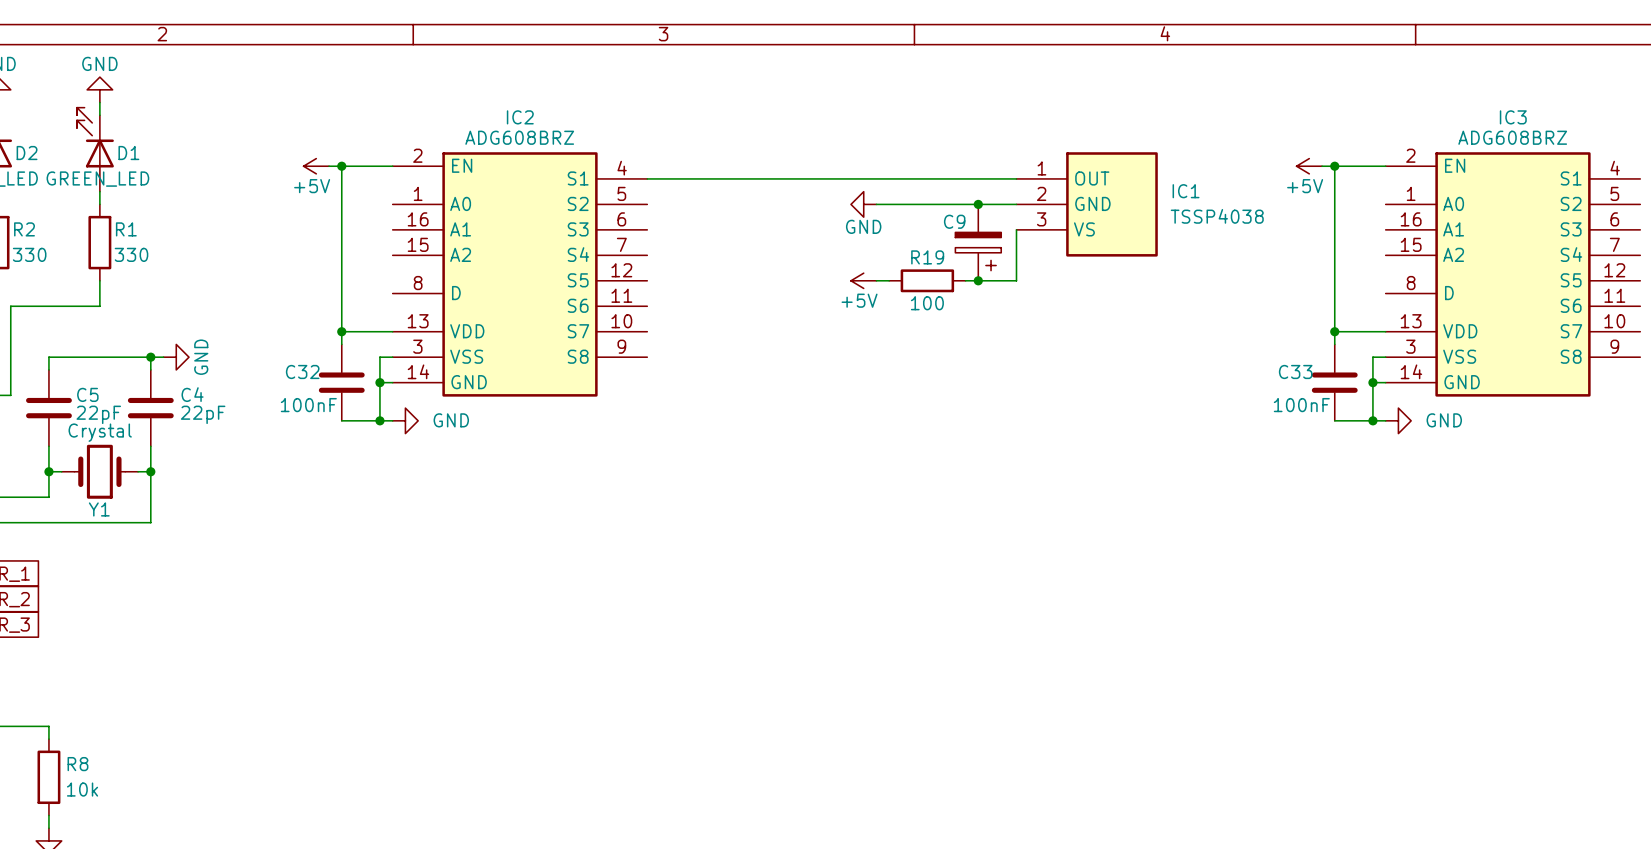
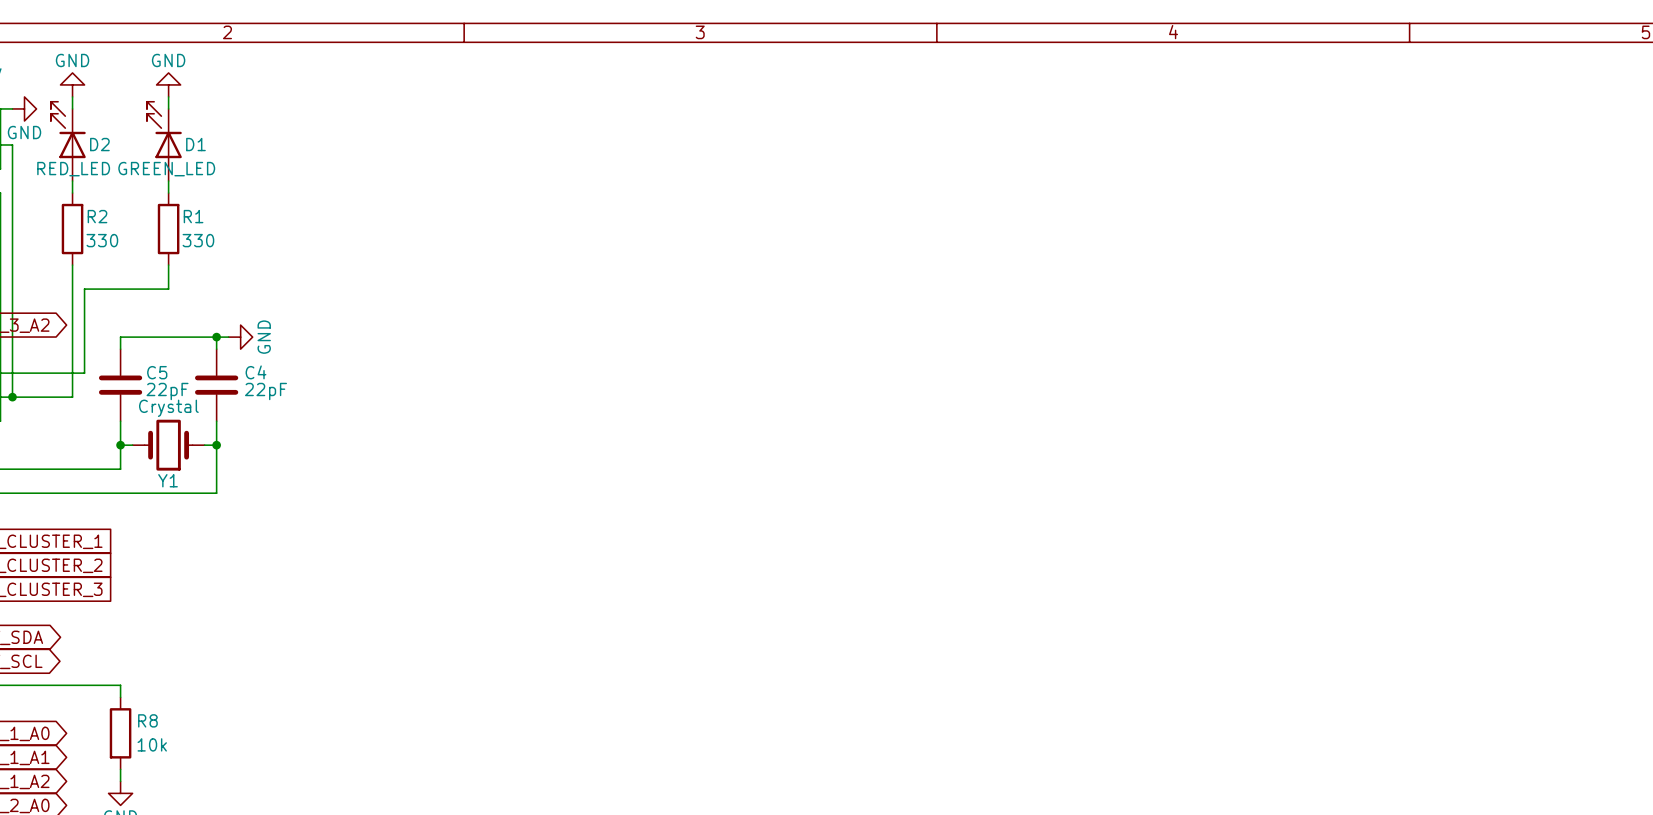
power symbol: +5V (316, 166) -> none
wire: (329, 166) (392, 166) -> none
wire: (341, 166) (341, 344) -> none
junction: (341, 166) -> none
power symbol: +5V (1309, 166) -> none
wire: (1322, 166) (1385, 166) -> none
wire: (1334, 166) (1334, 344) -> none
junction: (1334, 166) -> none
wire: (647, 178) (1016, 178) -> none
power symbol: GND (863, 204) -> none
wire: (876, 204) (1016, 204) -> none
junction: (978, 204) -> none
IC1: TSSP4038 (1087, 204) -> none
wire: (1016, 229) (1016, 280) (965, 280) -> none
C9: (978, 242) -> none
IC2: ADG608BRZ (519, 274) -> none
IC3: ADG608BRZ (1512, 274) -> none
power symbol: +5V (863, 280) -> none
wire: (876, 280) (889, 280) -> none
R19: 100 (927, 280) -> none
junction: (978, 280) -> none
wire: (341, 331) (392, 331) -> none
junction: (341, 331) -> none
wire: (1334, 331) (1385, 331) -> none
junction: (1334, 331) -> none
wire: (392, 357) (379, 357) (379, 420) -> none
wire: (1385, 357) (1372, 357) (1372, 420) -> none
C32: 100nF (341, 382) -> none
wire: (379, 382) (392, 382) -> none
junction: (379, 382) -> none
C33: 100nF (1334, 382) -> none
wire: (1372, 382) (1385, 382) -> none
junction: (1372, 382) -> none
wire: (341, 420) (392, 420) -> none
junction: (379, 420) -> none
power symbol: GND (405, 420) -> none
wire: (1334, 420) (1385, 420) -> none
junction: (1372, 420) -> none
power symbol: GND (1398, 420) -> none

